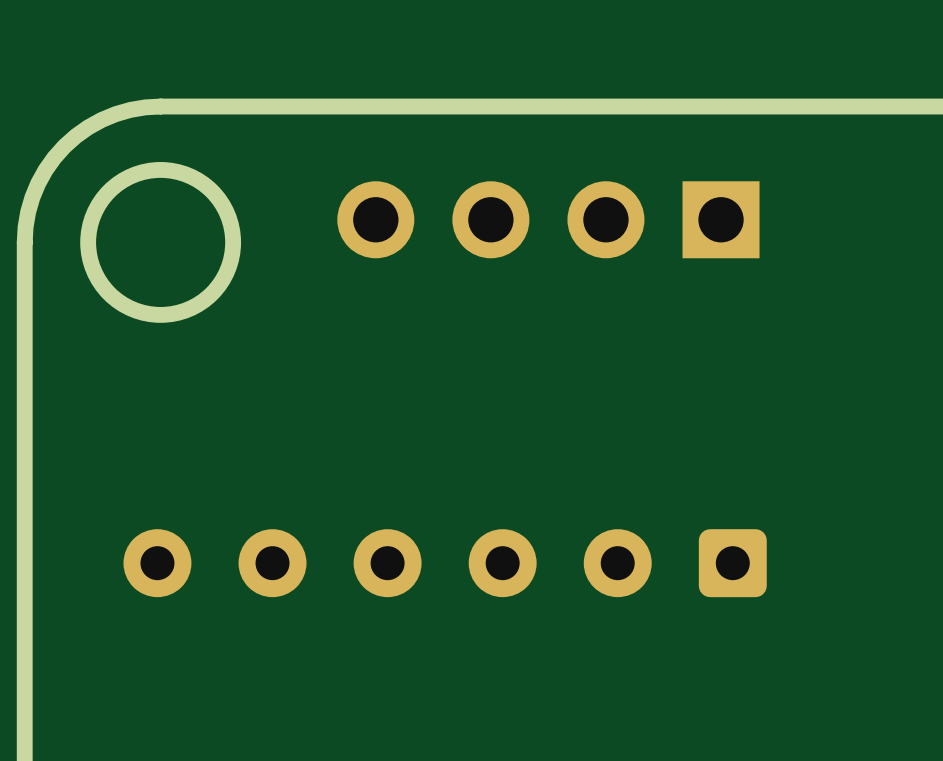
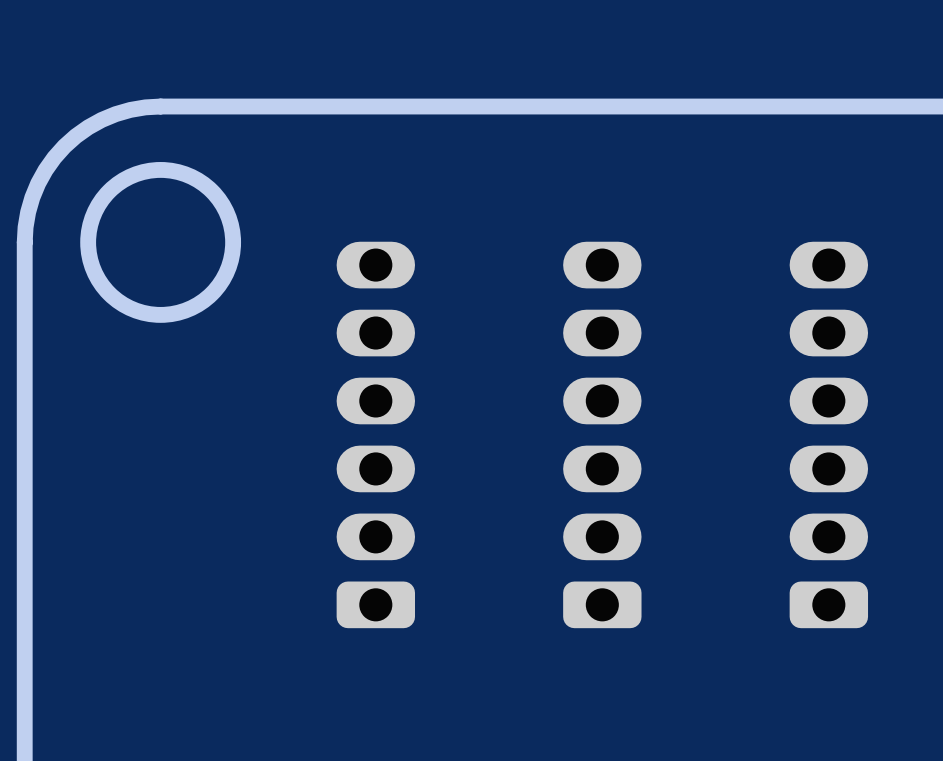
part: (548, 219) -> none
part: none -> (375, 434)
part: none -> (602, 434)
part: none -> (828, 434)
part: (445, 563) -> none

